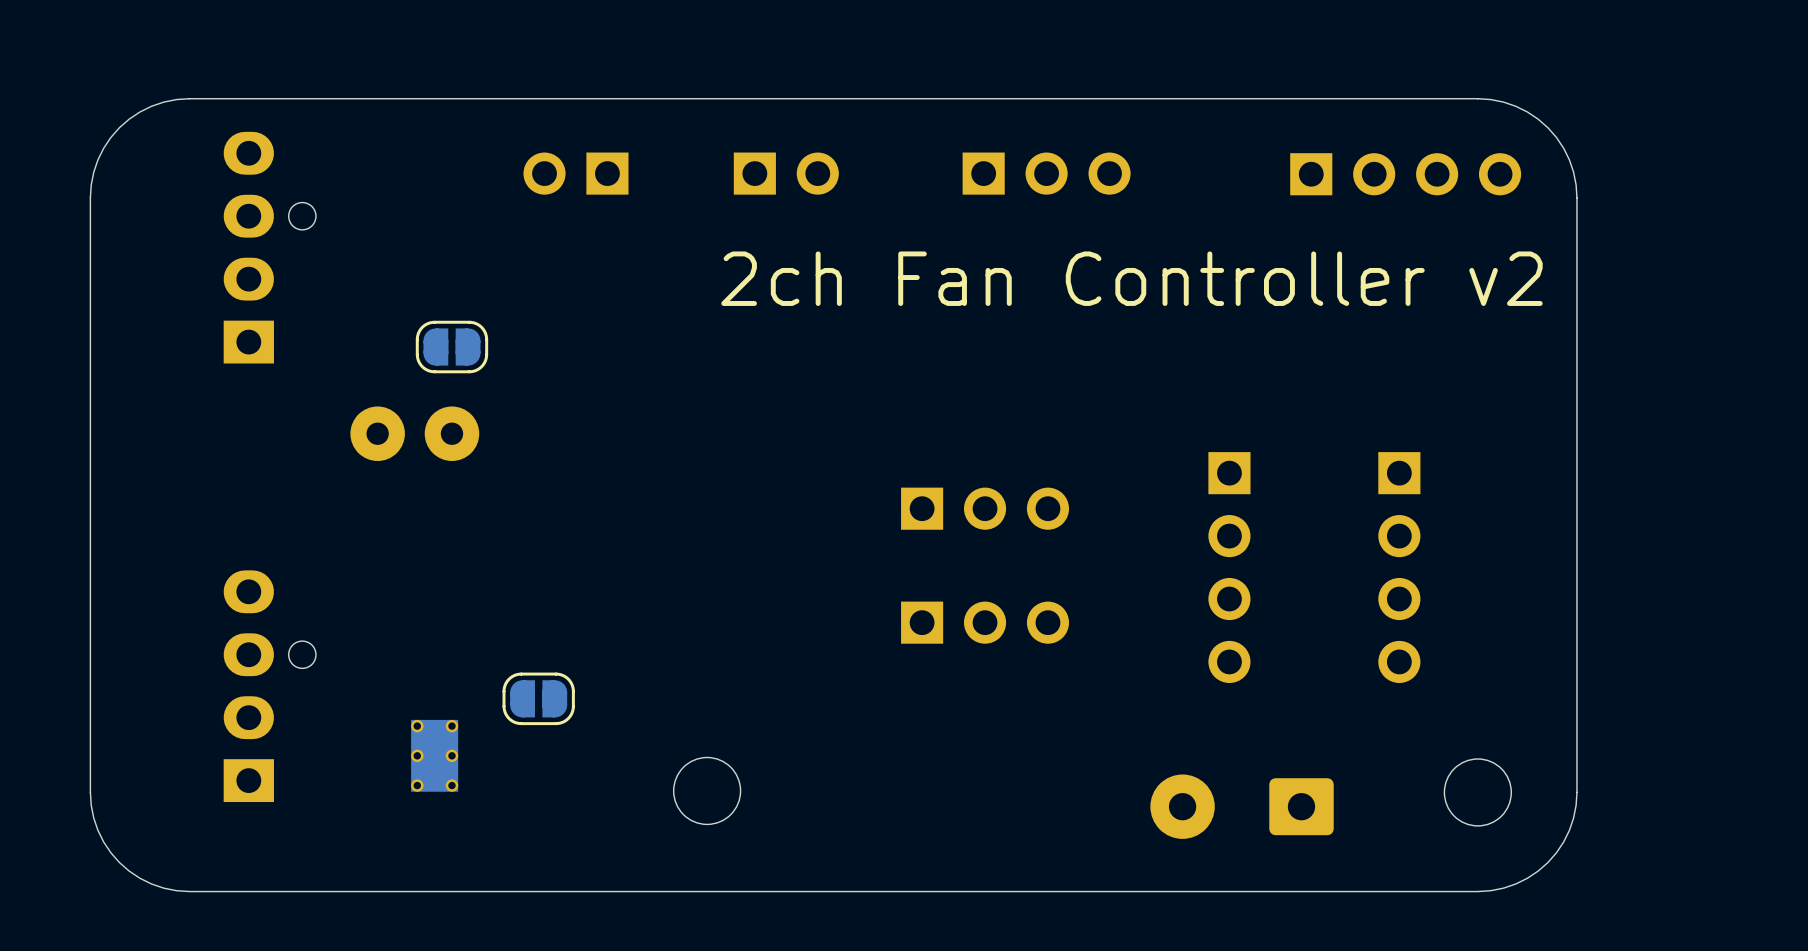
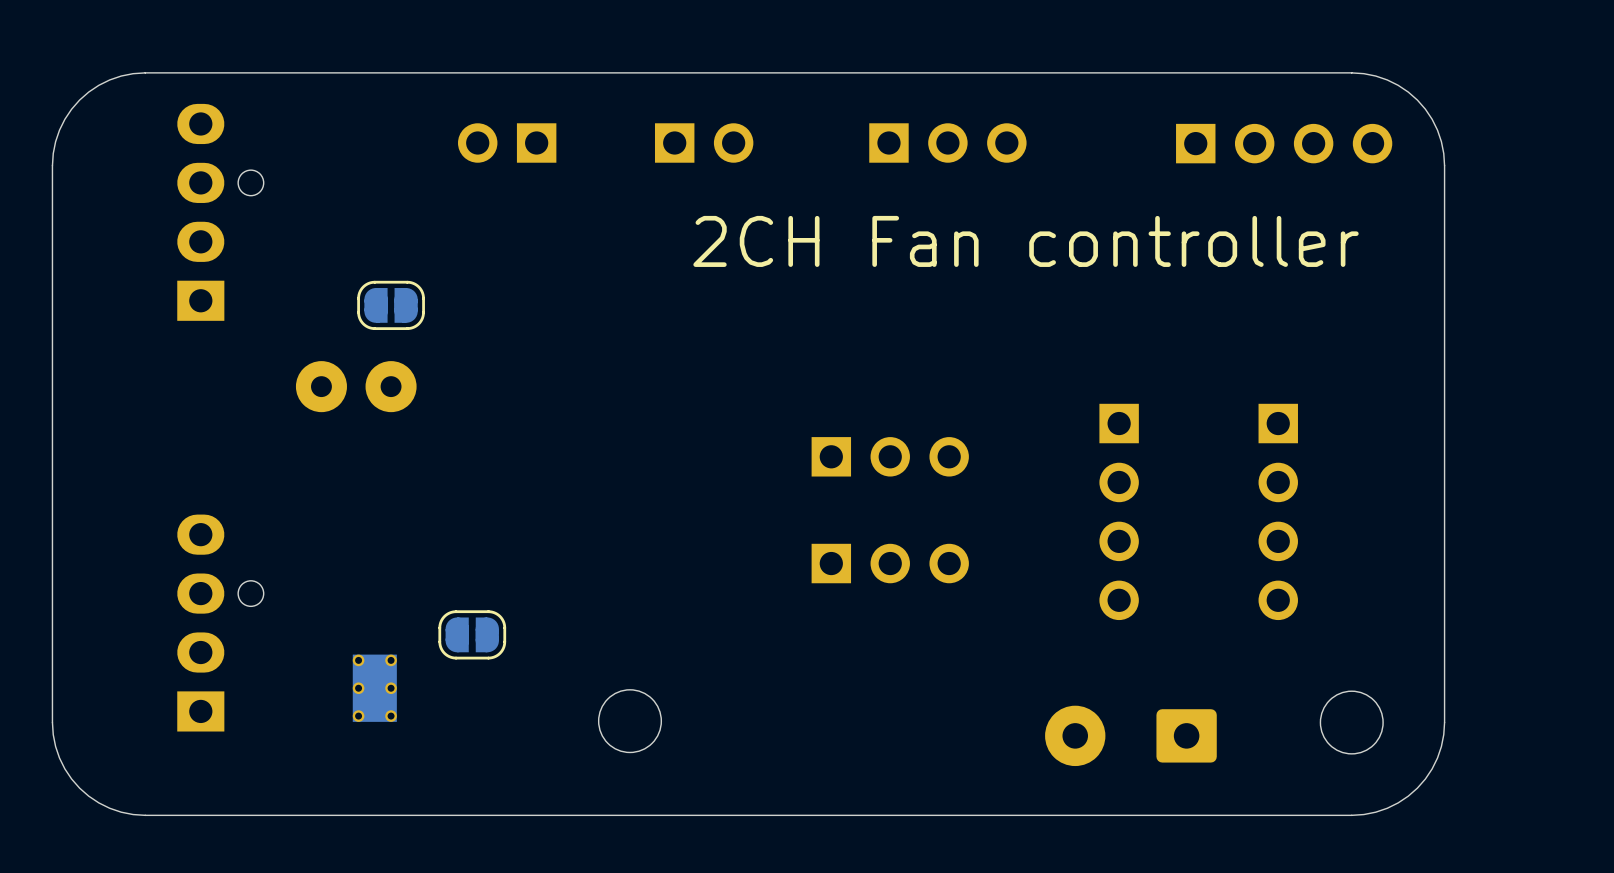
text: 2ch Fan Controller v2 (1131, 278) -> 2CH Fan controller (1026, 241)

